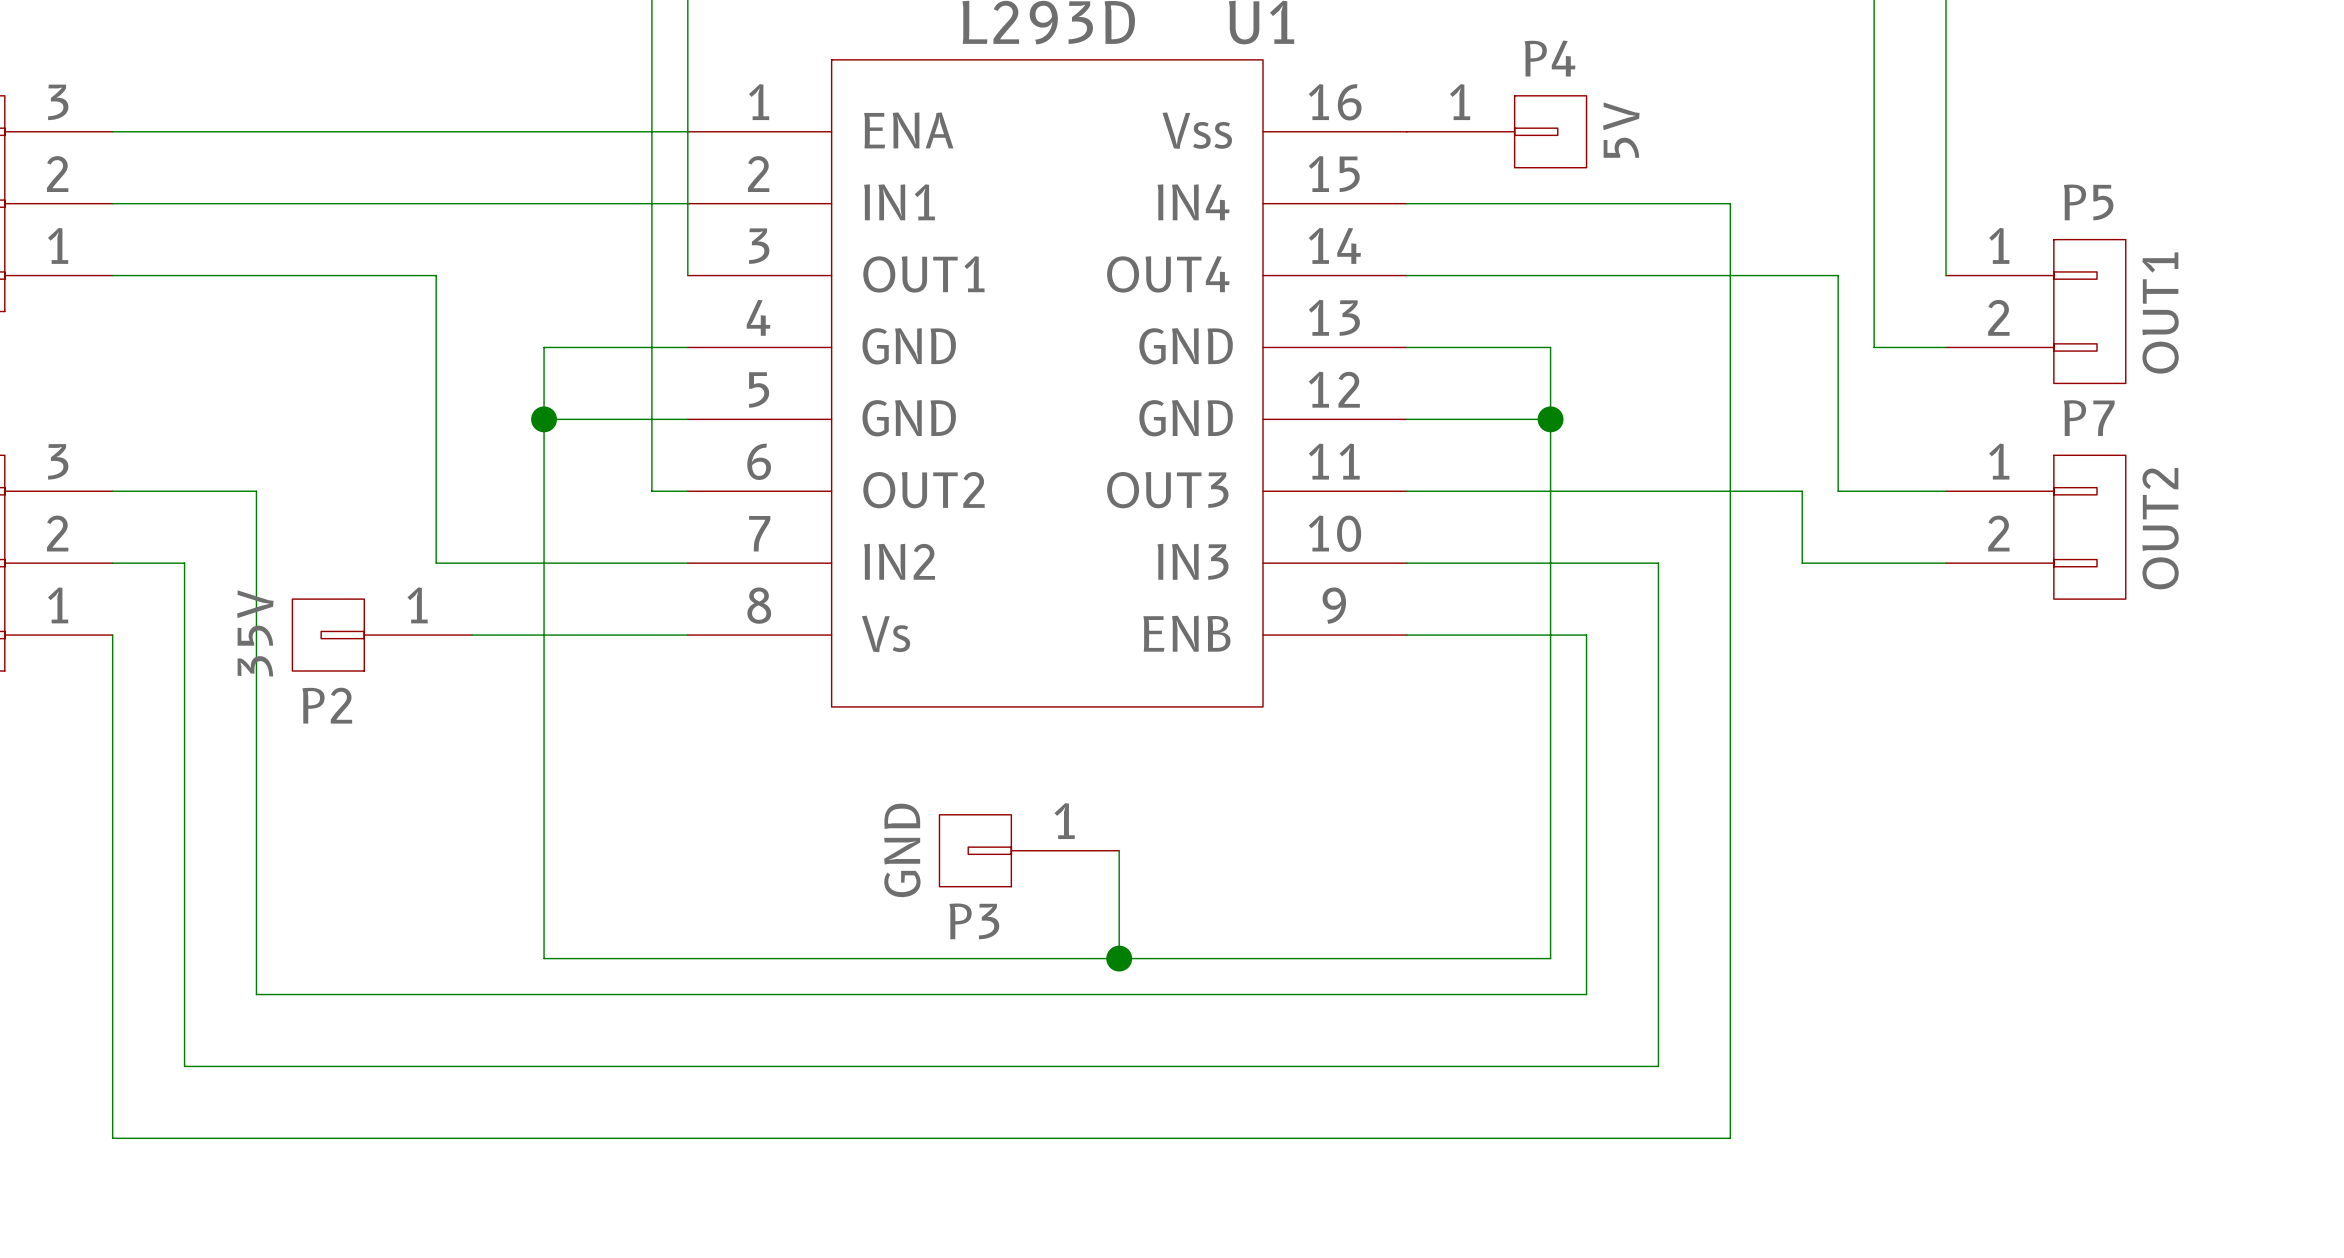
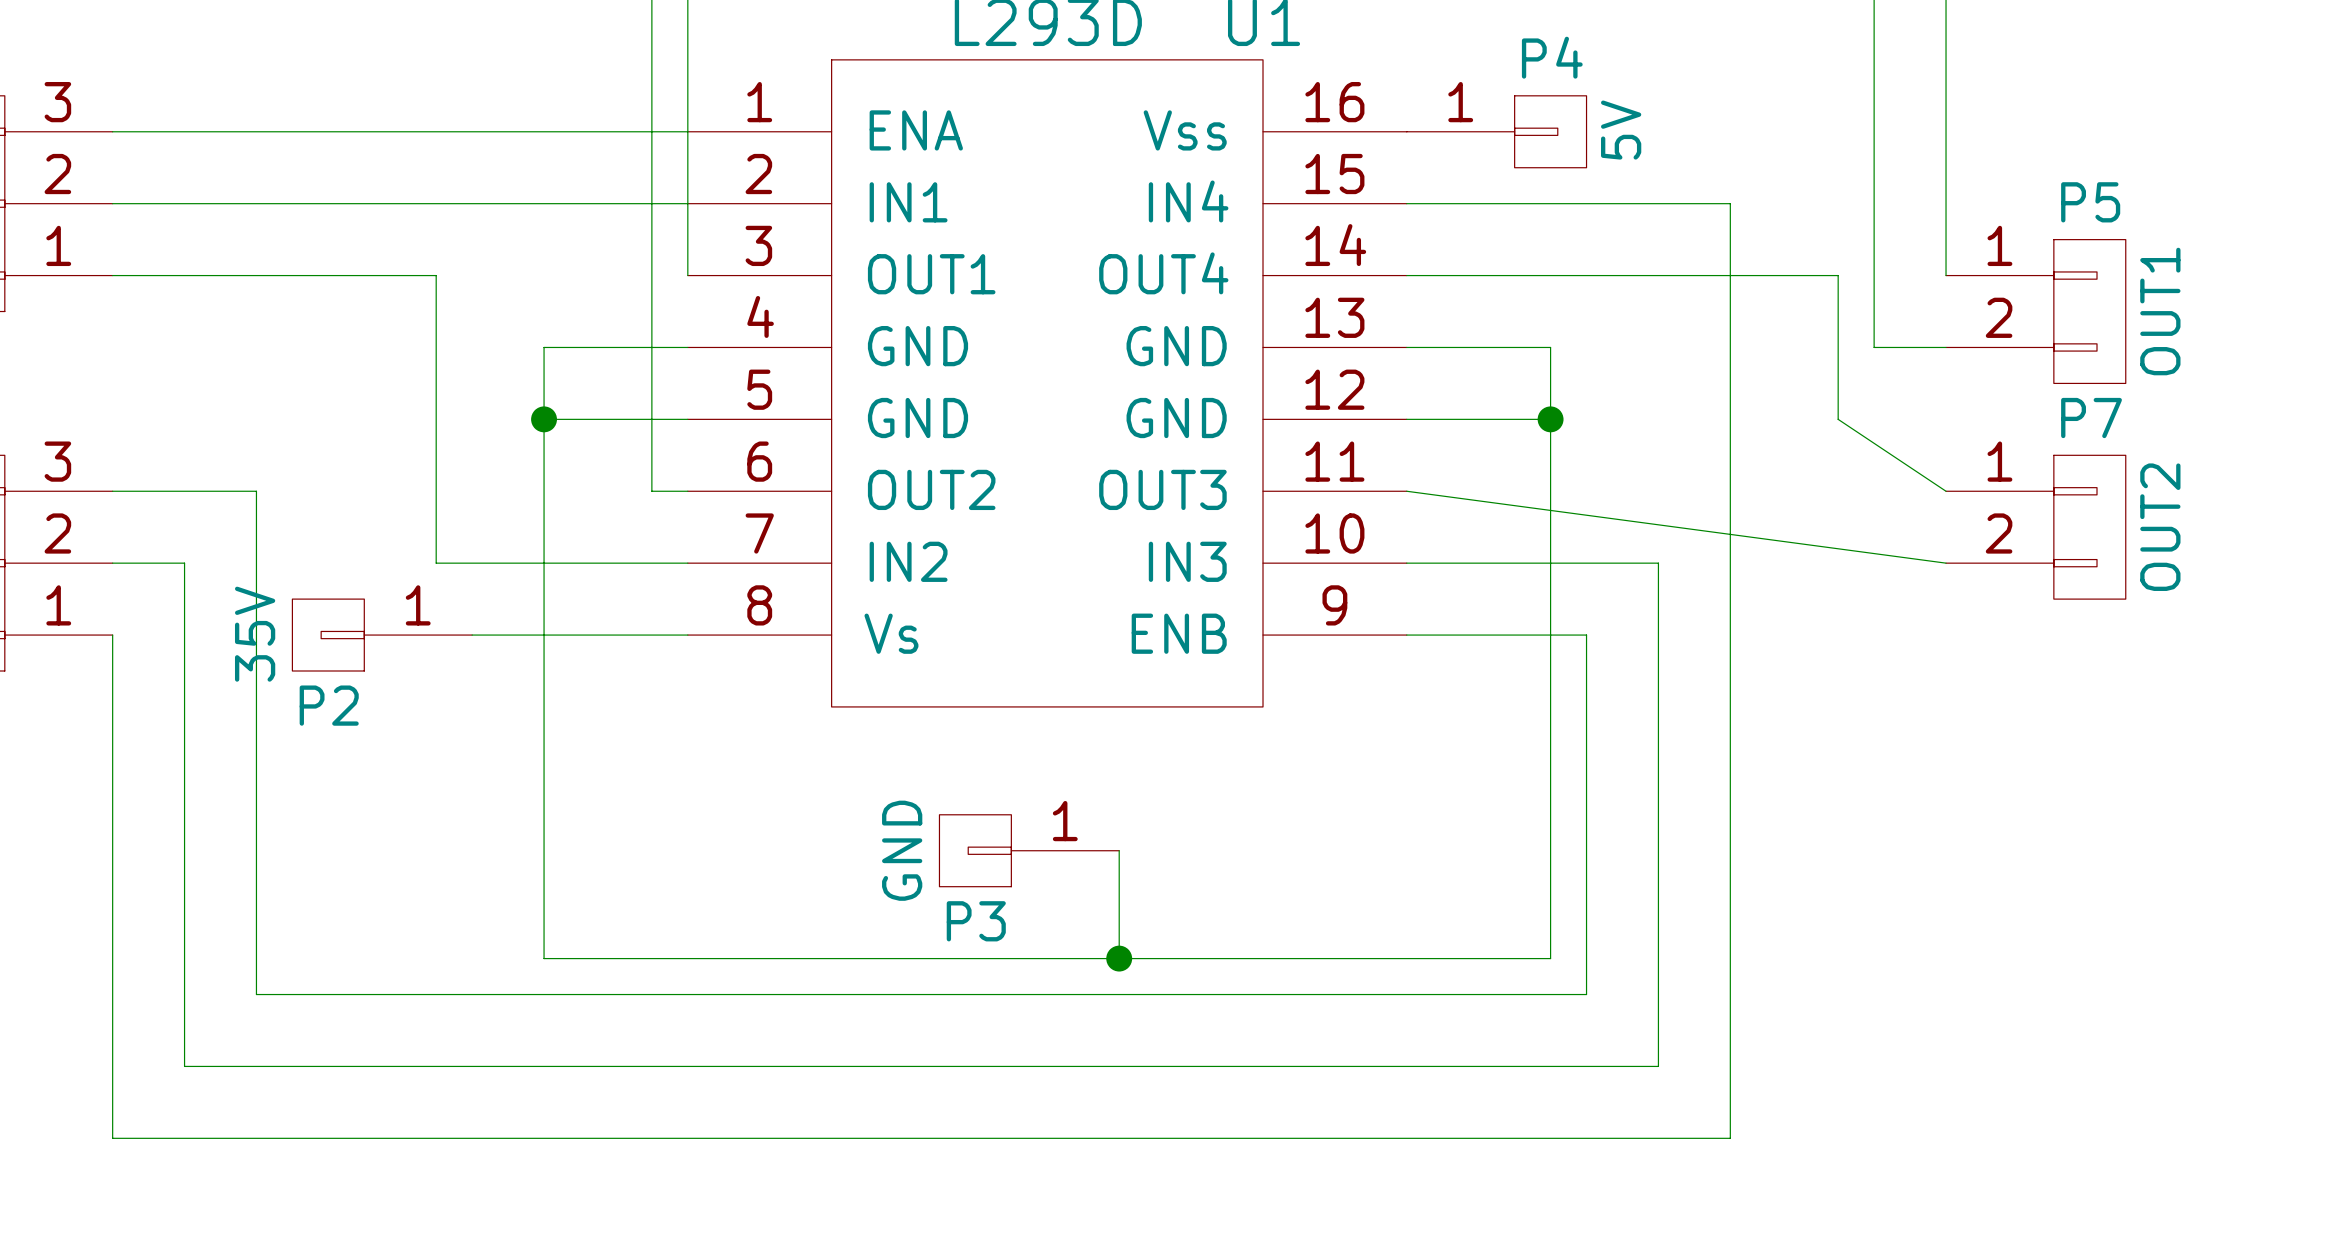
wire: (1838, 419) (1838, 491) (1946, 491) -> (1838, 419) (1946, 491)
wire: (1406, 491) (1802, 491) (1802, 563) (1946, 563) -> (1406, 491) (1946, 563)

